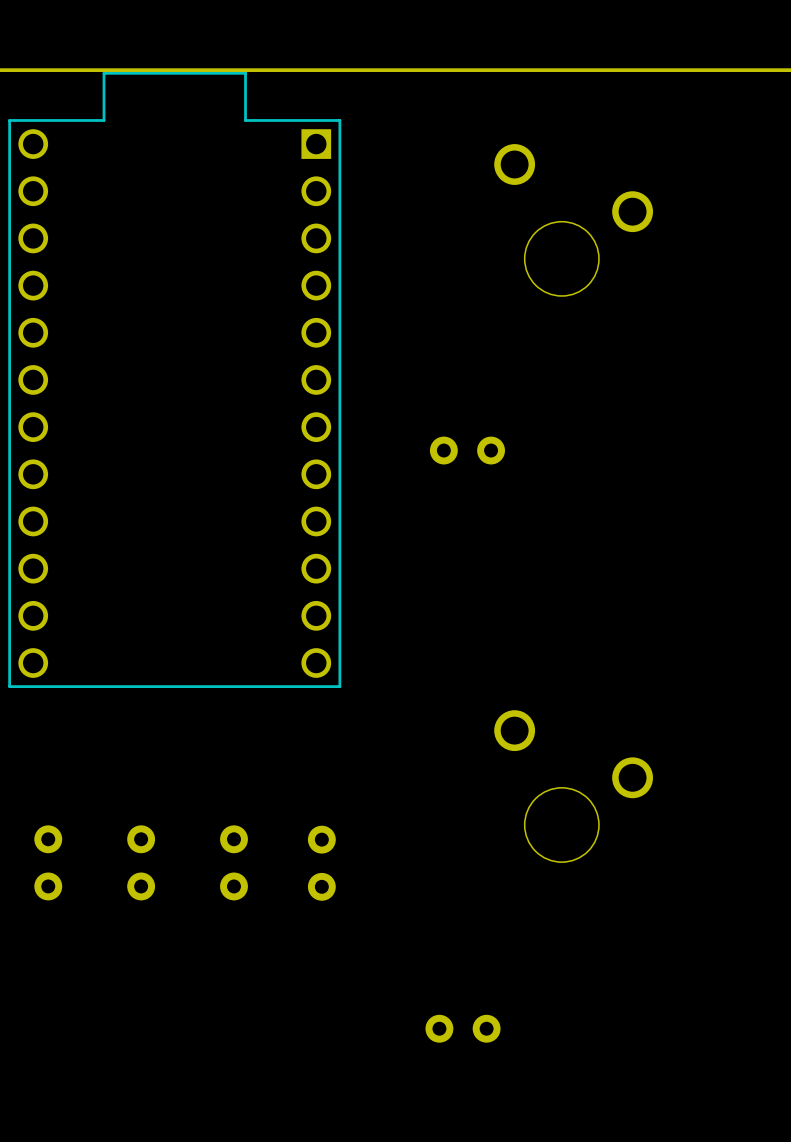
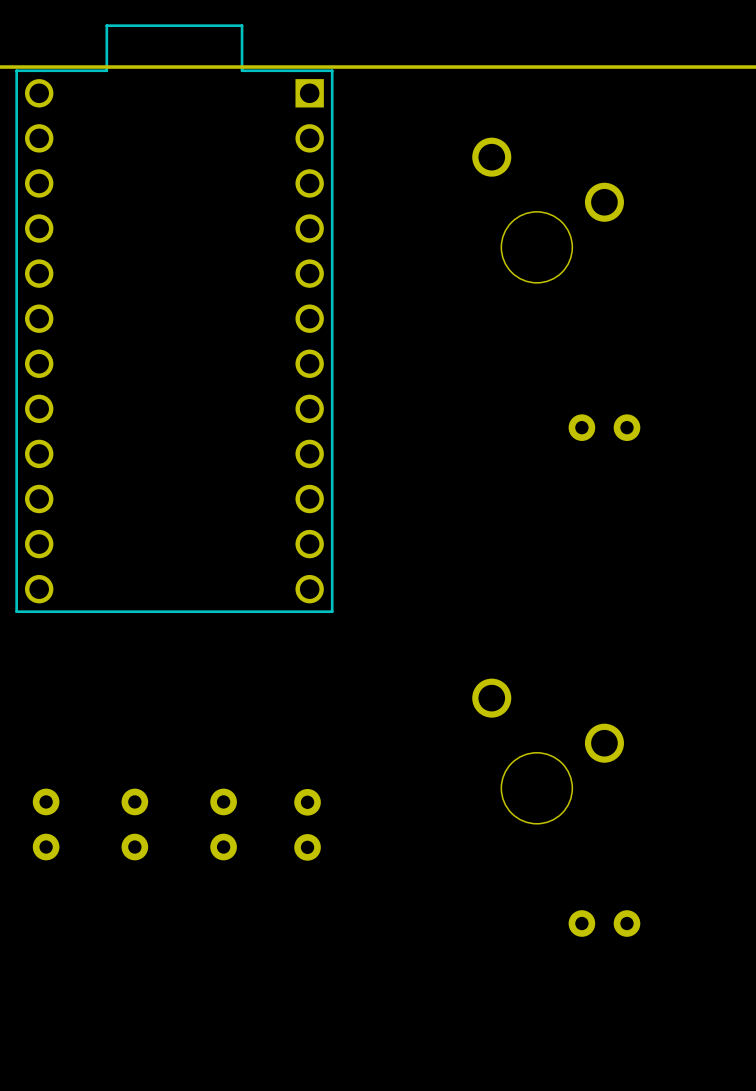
part position: (174, 379) -> (174, 318)
part: none -> (581, 427)
part: none -> (626, 427)
part: (443, 450) -> none
part: (491, 450) -> none
part: none -> (581, 923)
part: none -> (626, 923)
part: (439, 1028) -> none
part: (486, 1028) -> none

